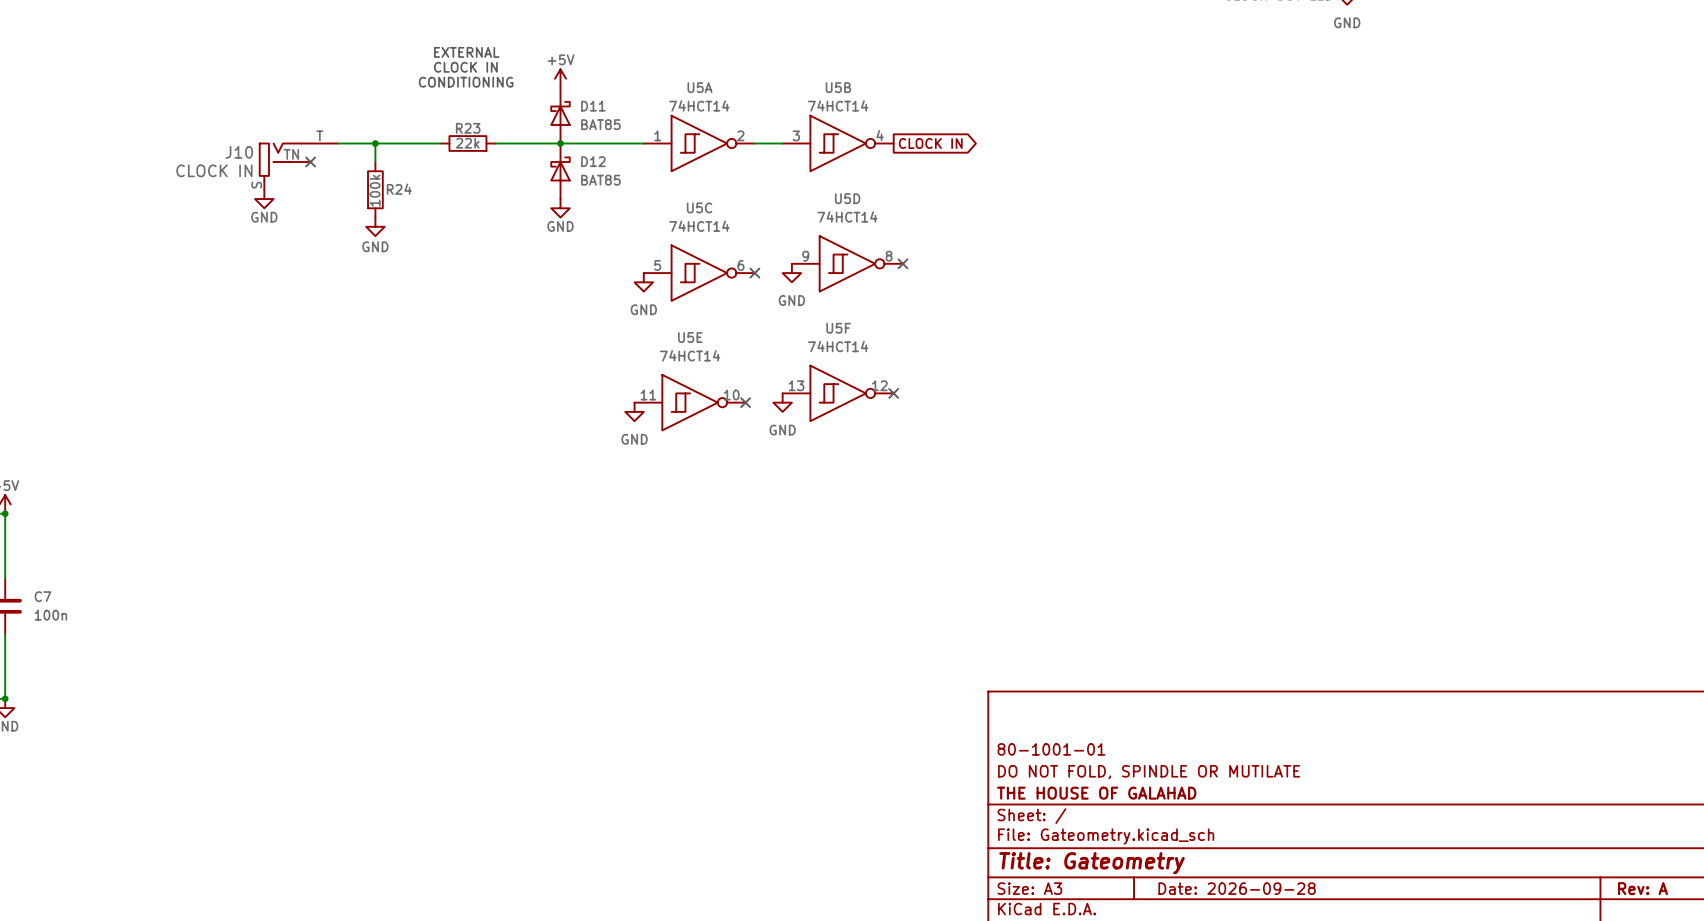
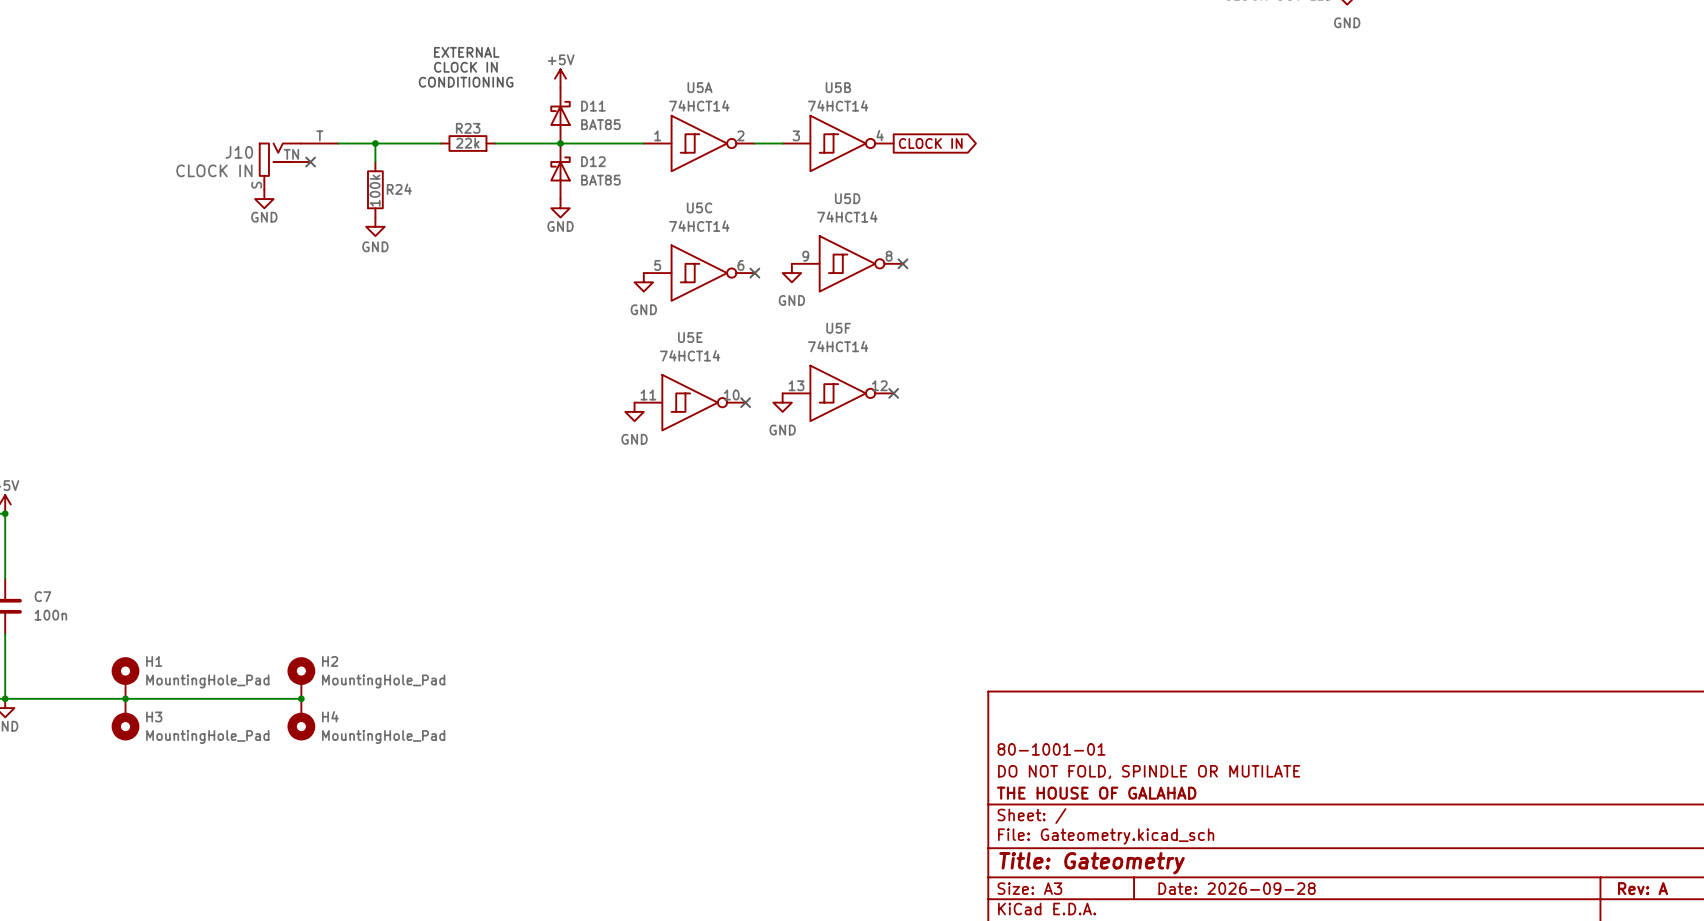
H1: none -> MountingHole_Pad (125, 677)
H2: none -> MountingHole_Pad (301, 677)
wire: none -> (5, 698) (301, 698)
junction: none -> (125, 698)
junction: none -> (301, 698)
H3: none -> MountingHole_Pad (125, 719)
H4: none -> MountingHole_Pad (301, 719)

